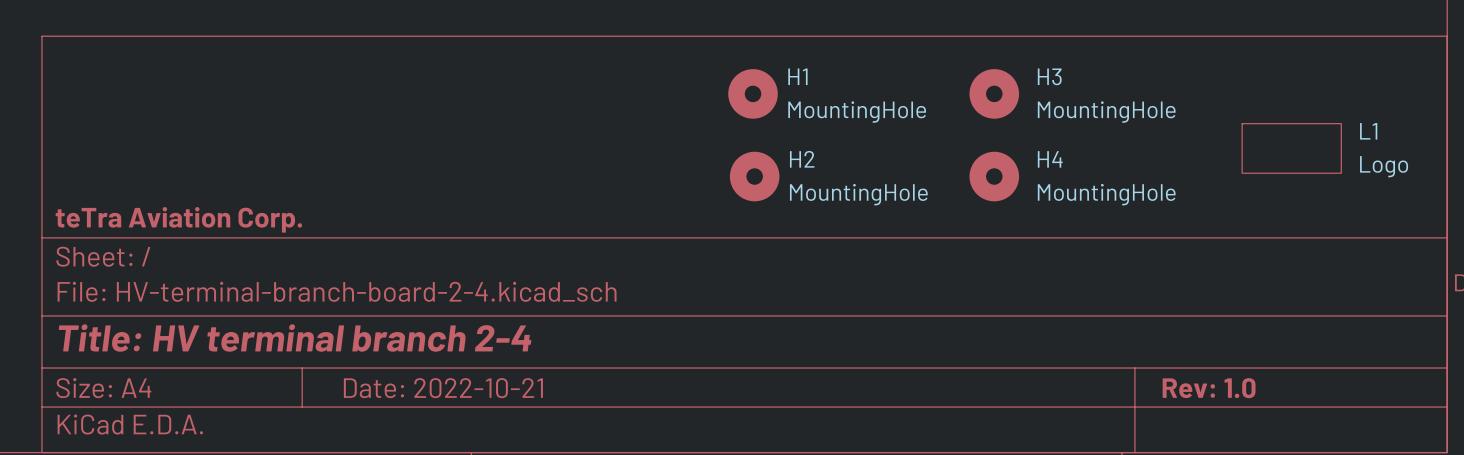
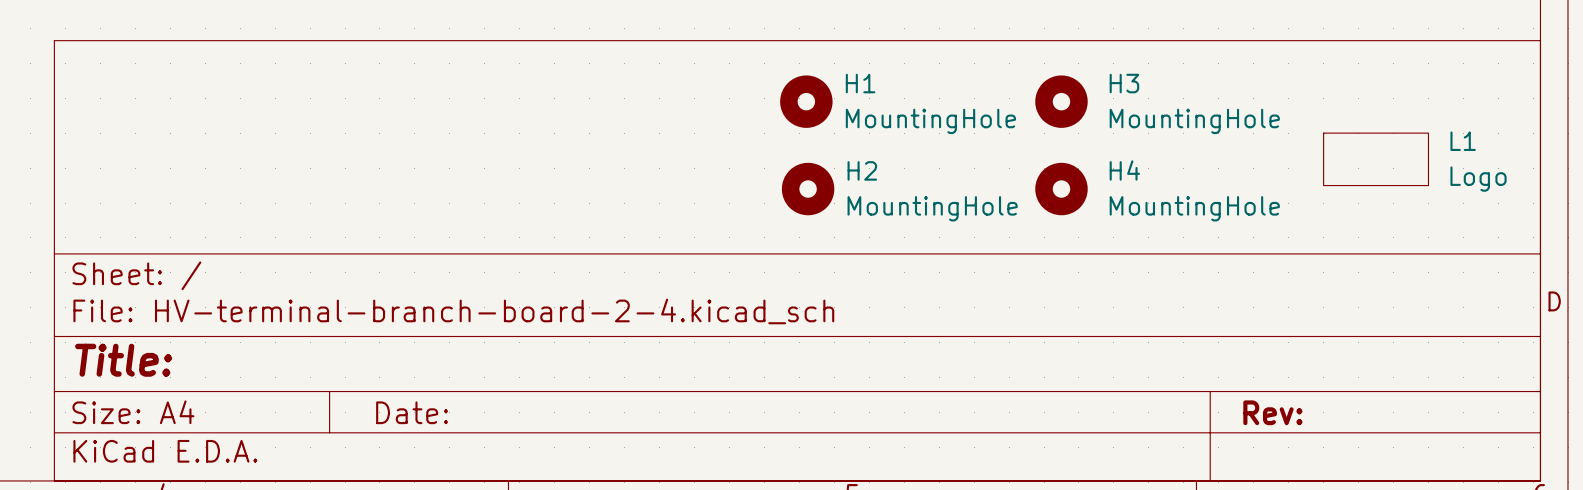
title block: teTra Aviation Corp. (178, 219) -> none
title block: Title: HV terminal branch 2-4 (295, 338) -> Title: (123, 360)
title block: Date: 2022-10-21 (443, 388) -> Date: (412, 412)
title block: Rev: 1.0 (1209, 388) -> Rev: (1272, 412)

